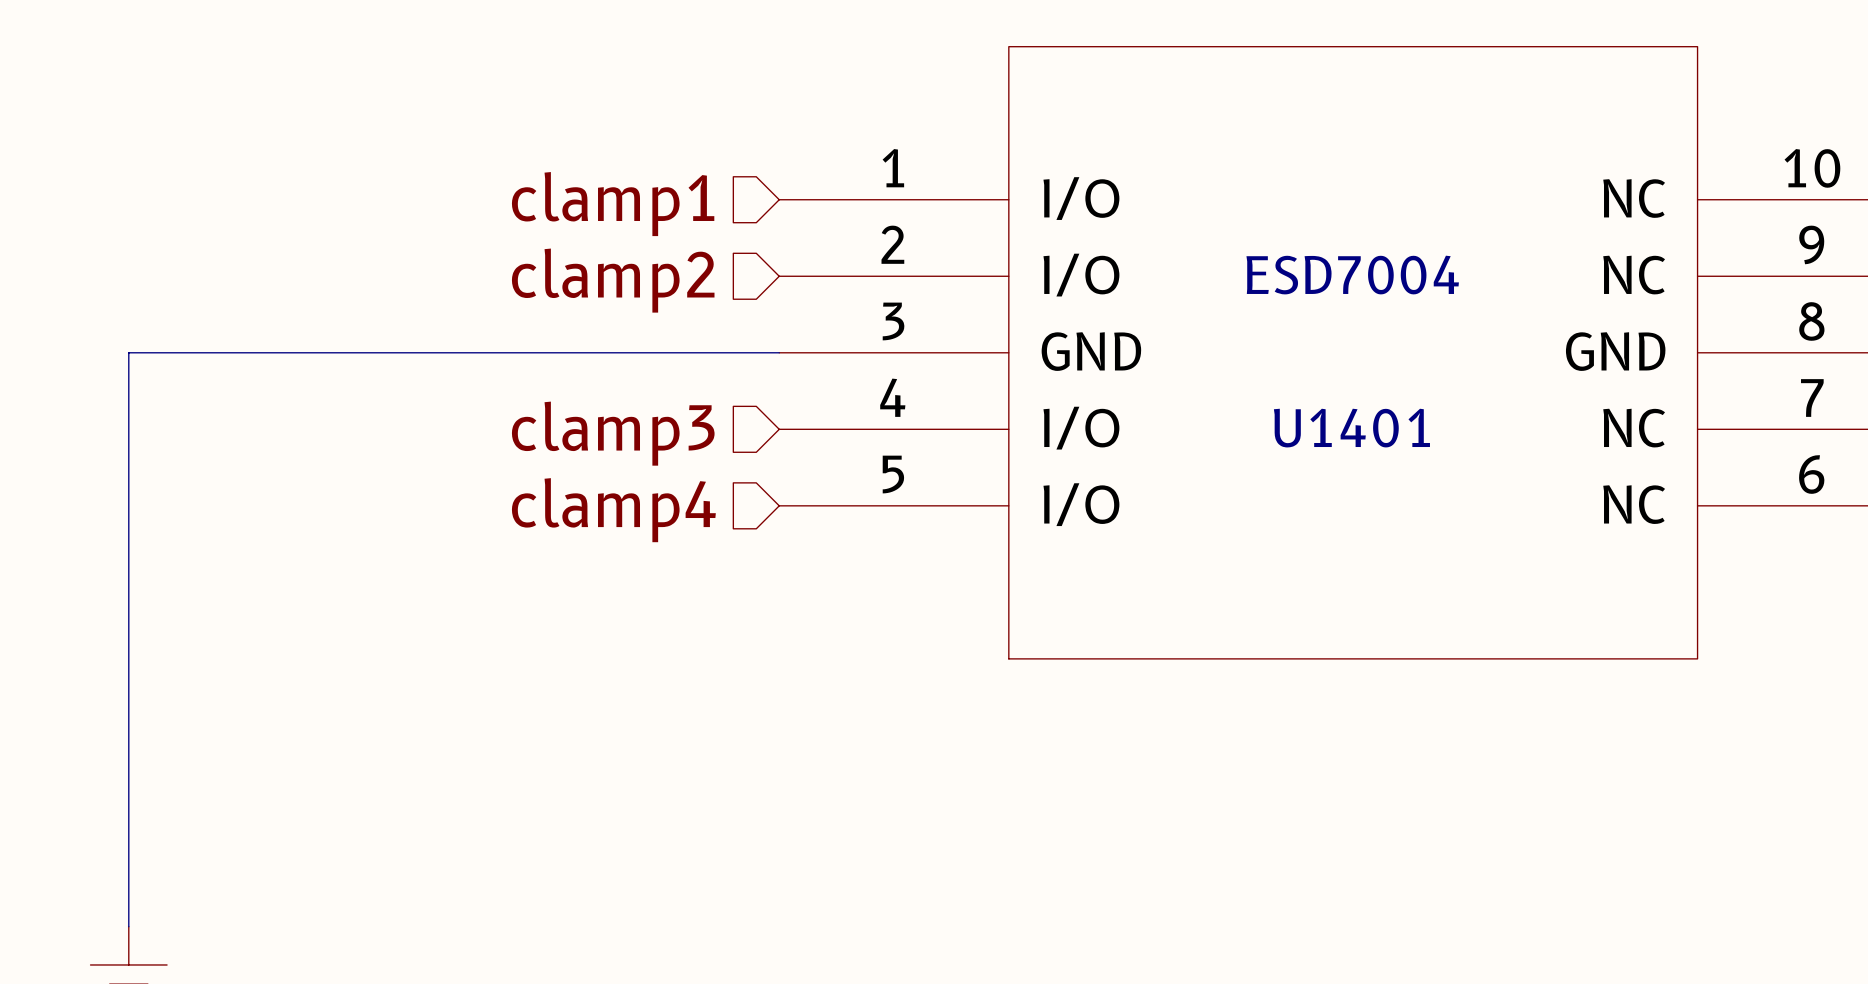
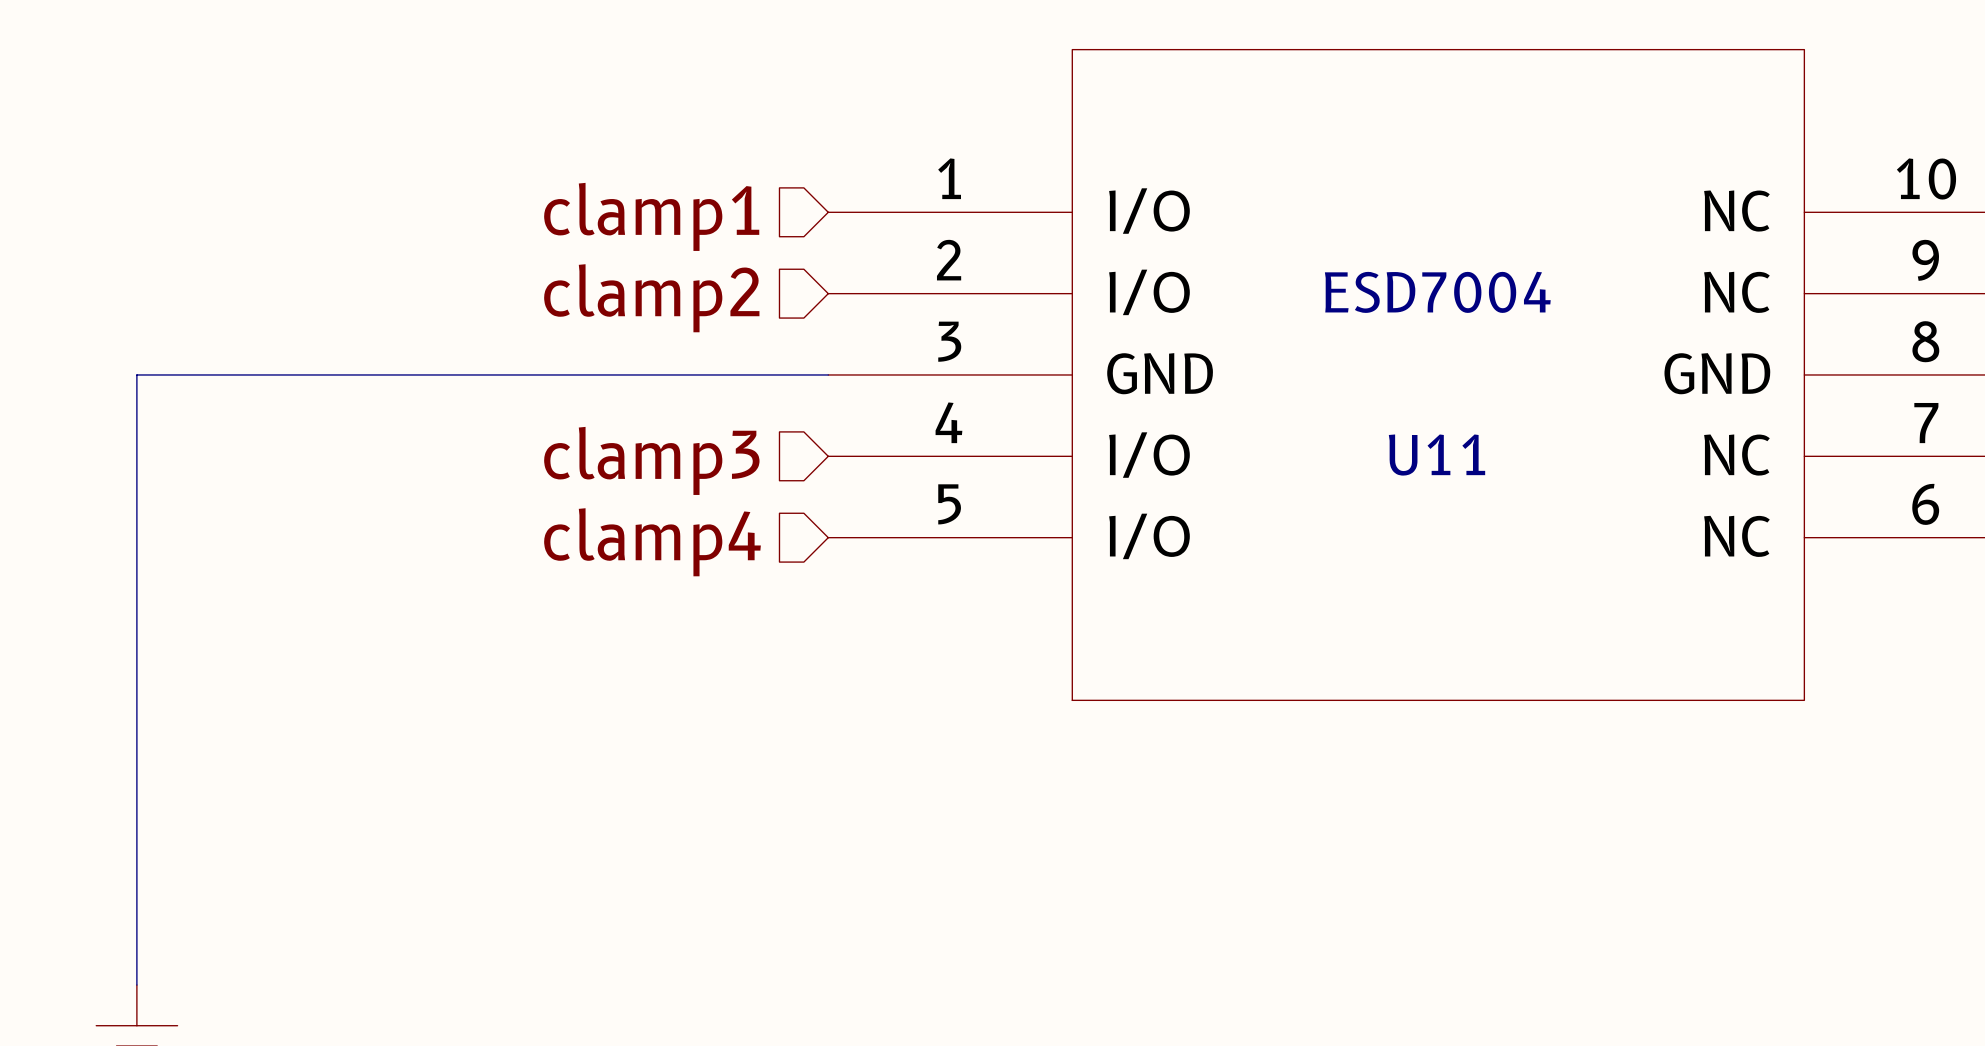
U1401 name: U1401 (1351, 428) -> U11 (1437, 455)

